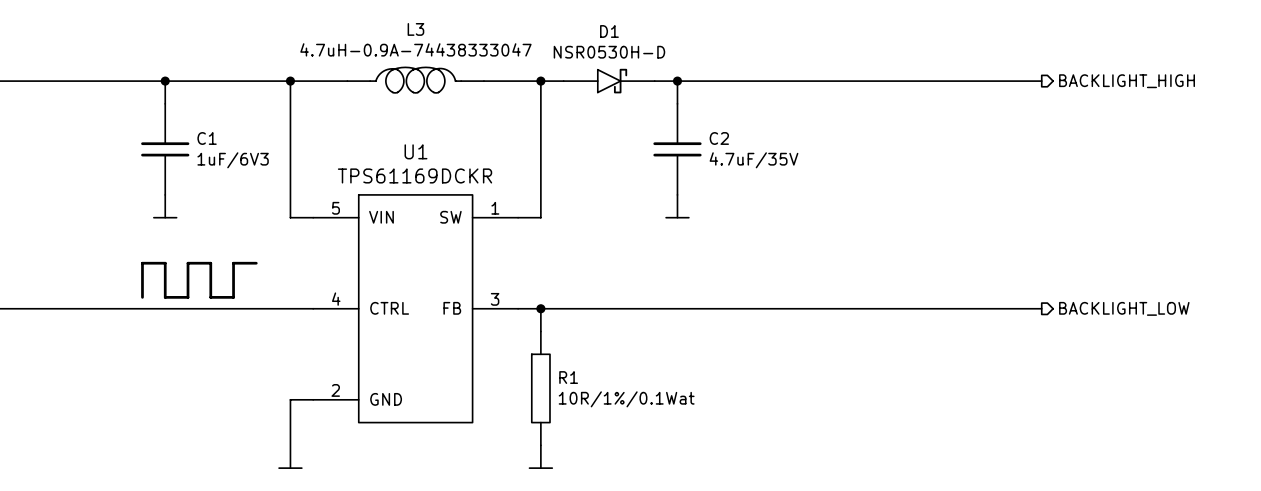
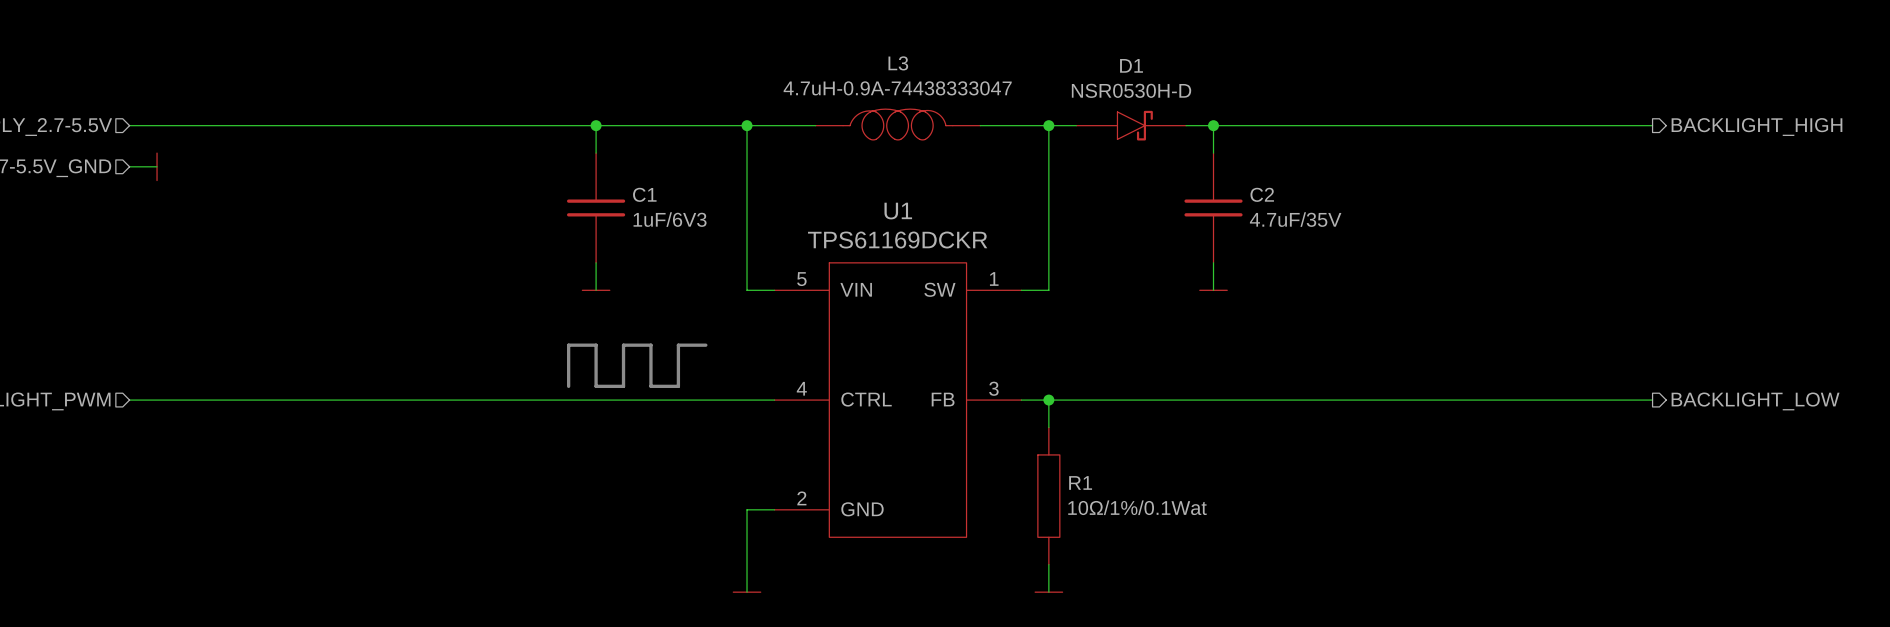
R1 value: 10R/1%/0.1Wat (626, 399) -> 10Ω/1%/0.1Wat (1137, 507)

